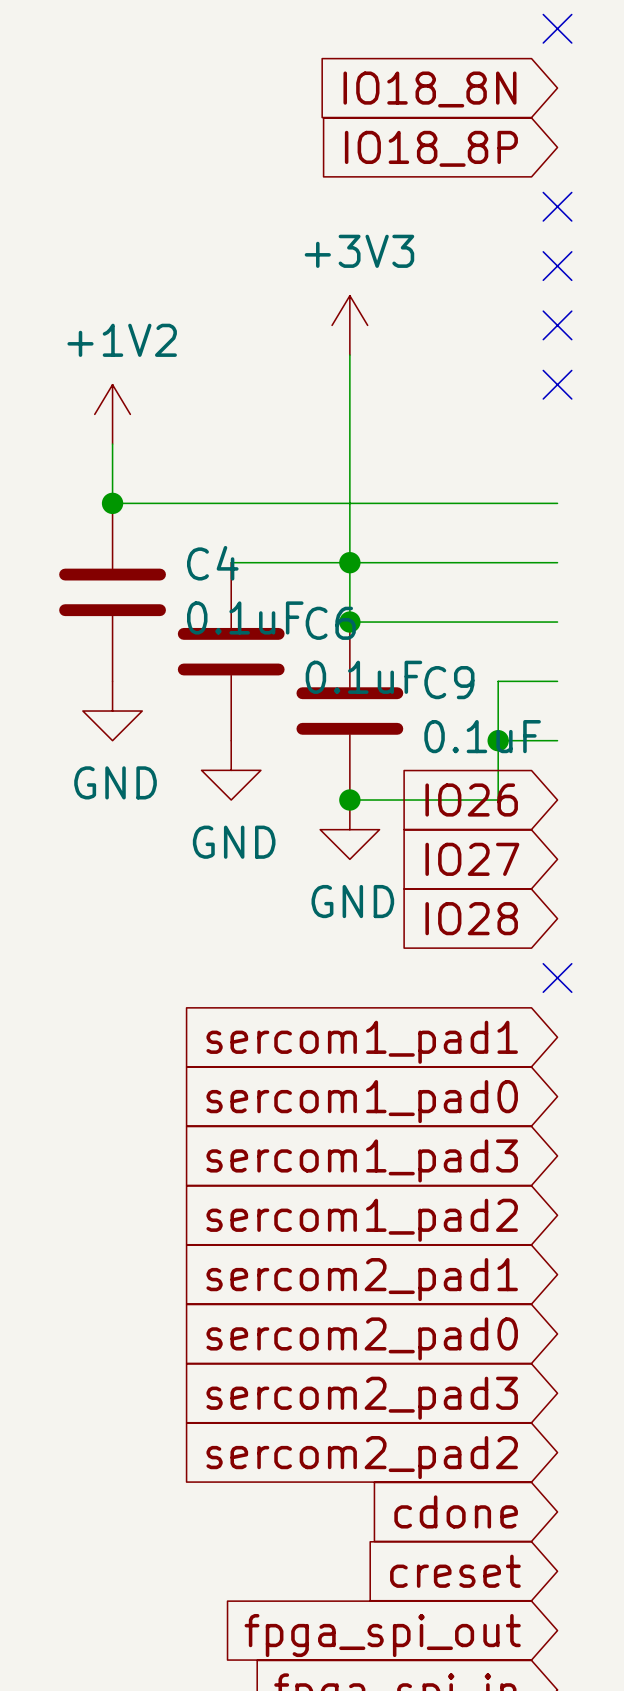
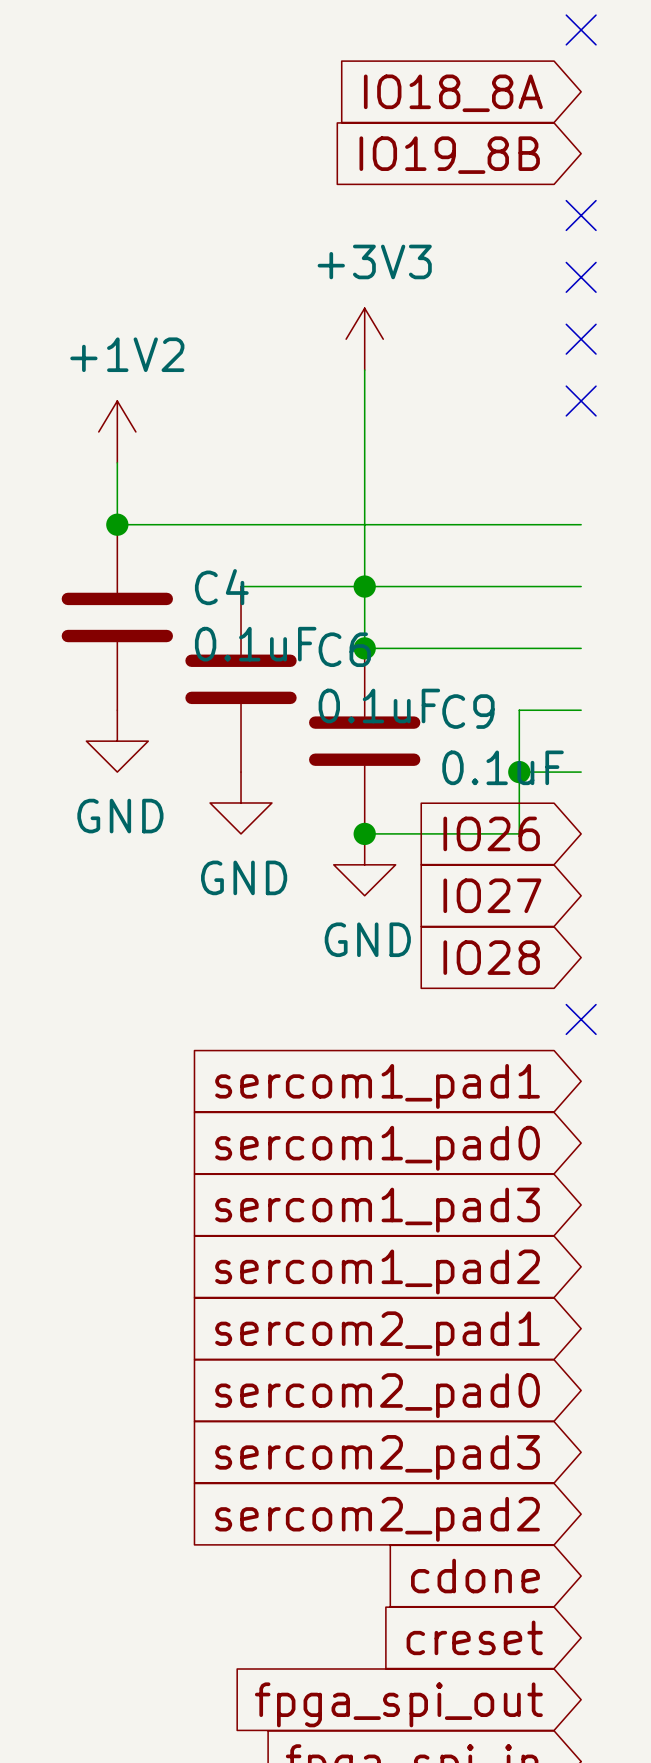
global label: IO18_8N (429, 89) -> IO18_8A (453, 93)
global label: IO18_8P (431, 148) -> IO19_8B (449, 155)

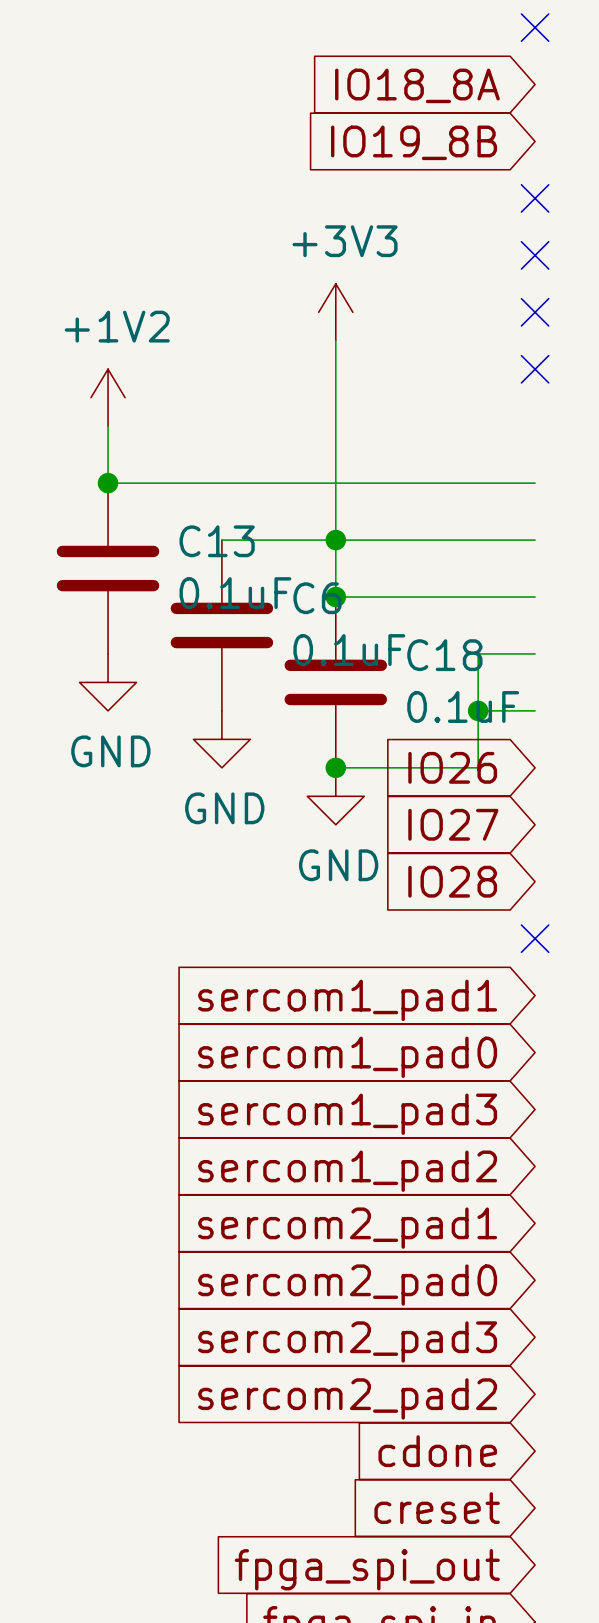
C4 name: C4 (221, 587) -> C13 (217, 541)
C9 name: C9 (468, 711) -> C18 (444, 655)

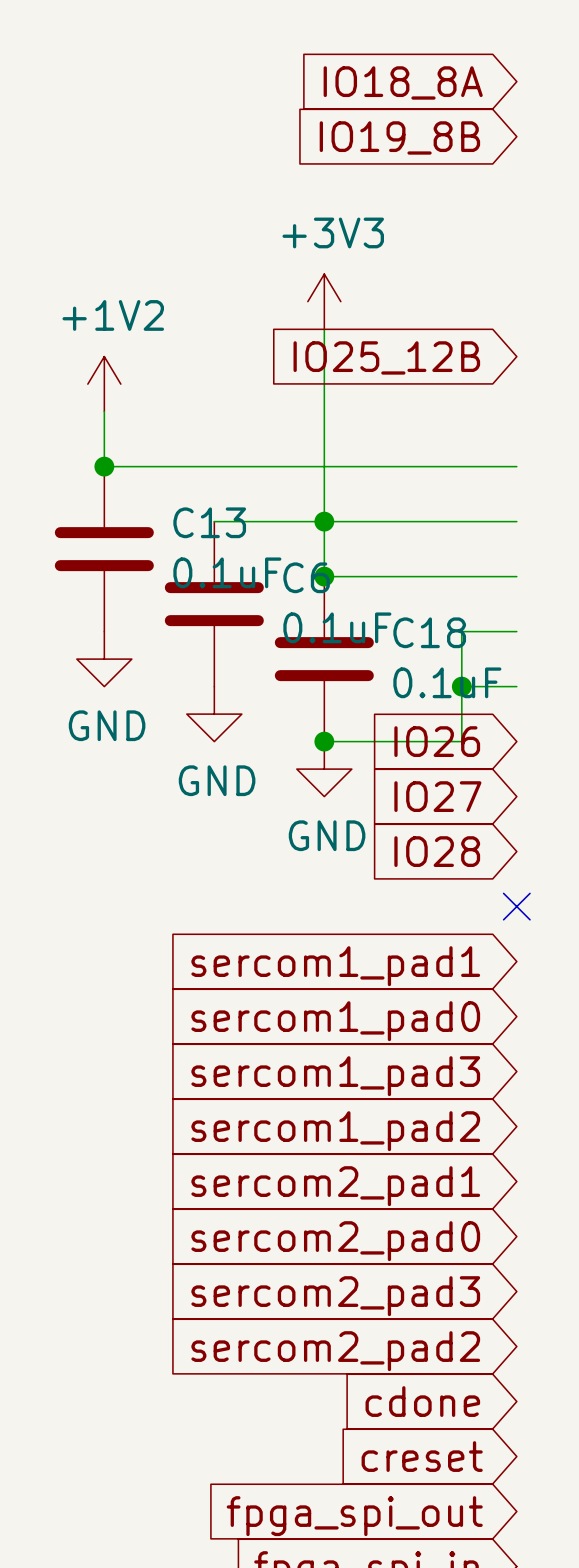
no-connect mark: (535, 27) -> none
no-connect mark: (535, 198) -> none
no-connect mark: (535, 255) -> none
no-connect mark: (535, 312) -> none
no-connect mark: (535, 369) -> none
global label: none -> IO25_12B (386, 357)

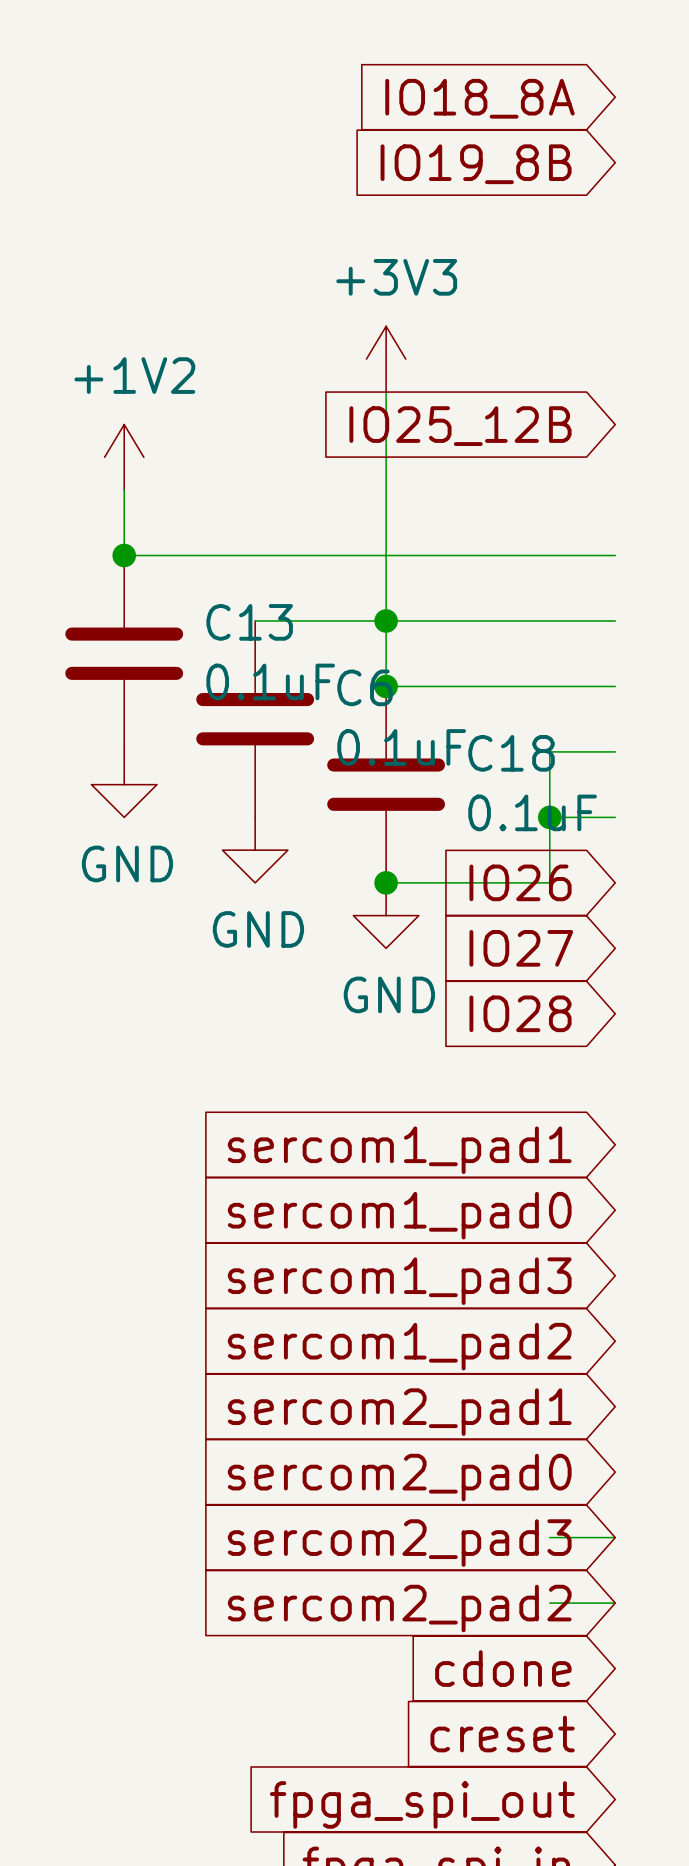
no-connect mark: (516, 906) -> none
wire: none -> (549, 1537) (615, 1537)
wire: none -> (549, 1603) (615, 1603)

